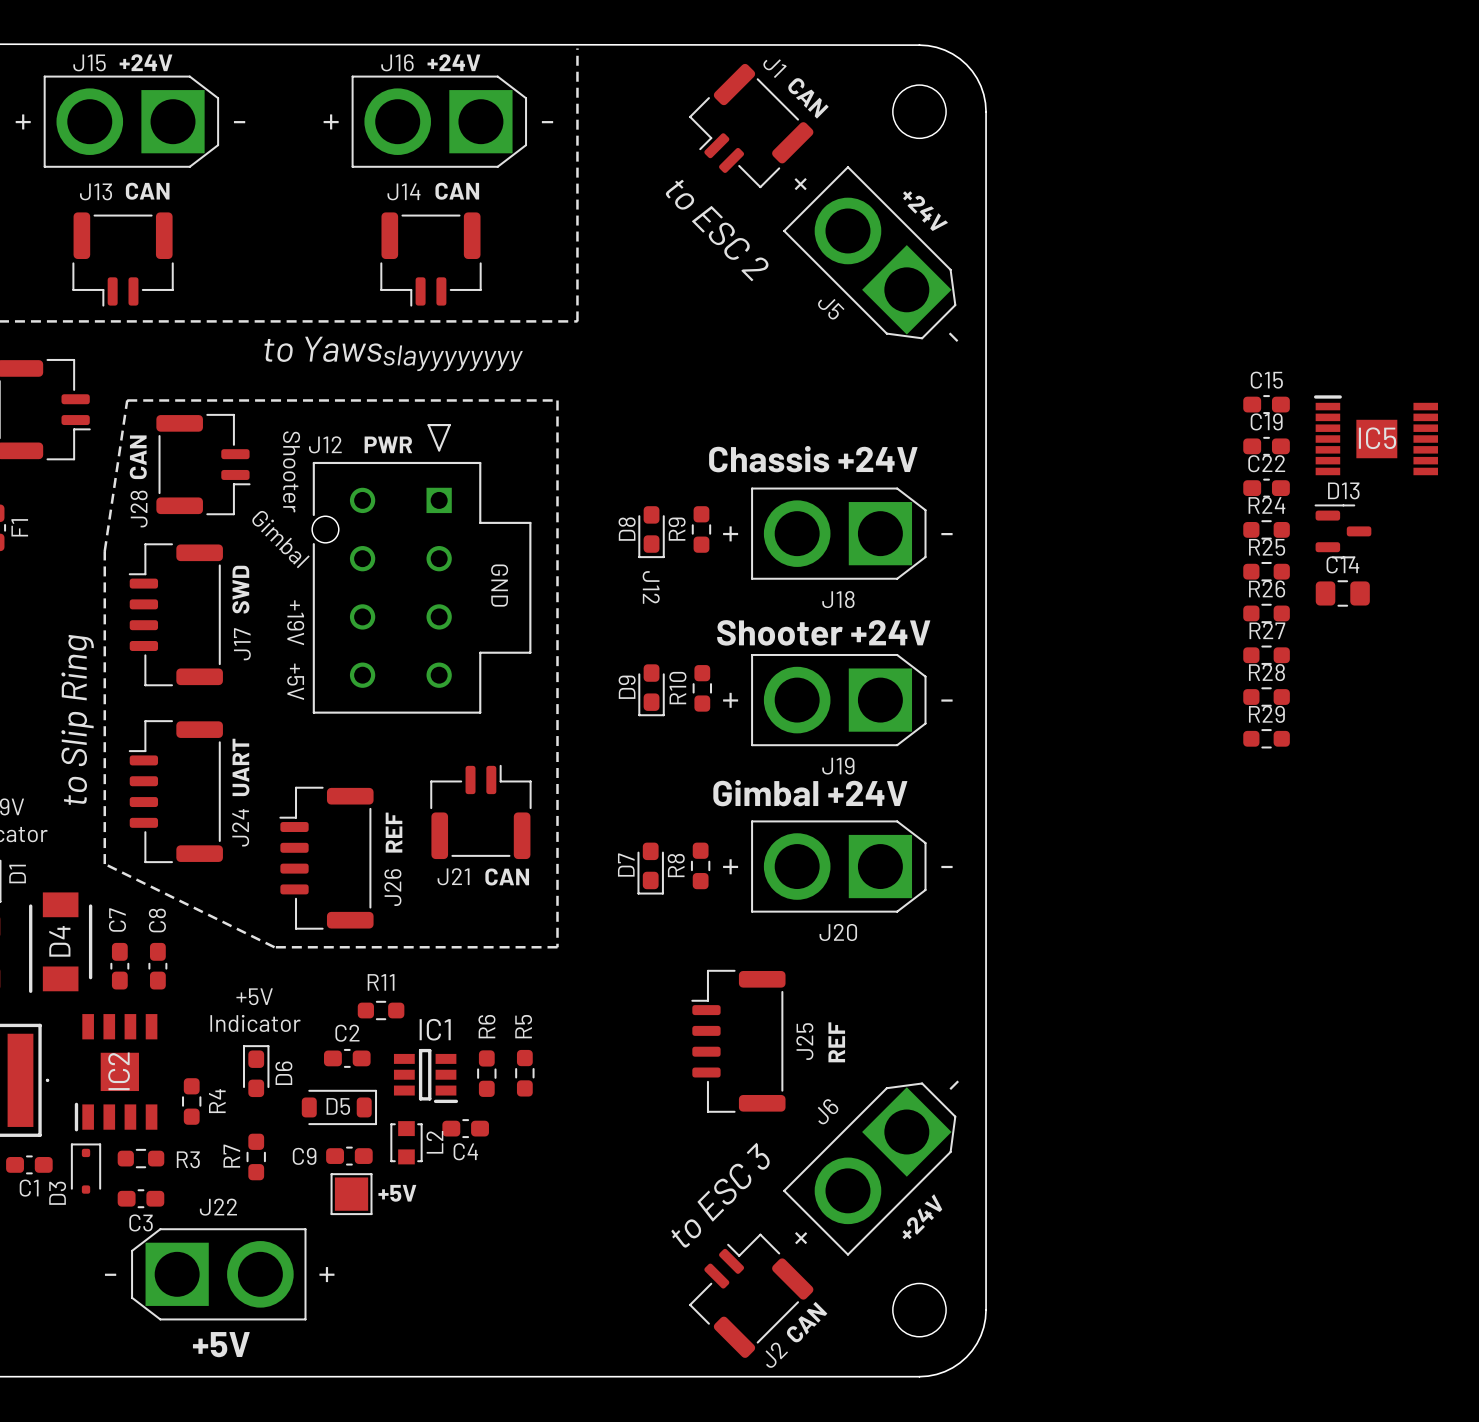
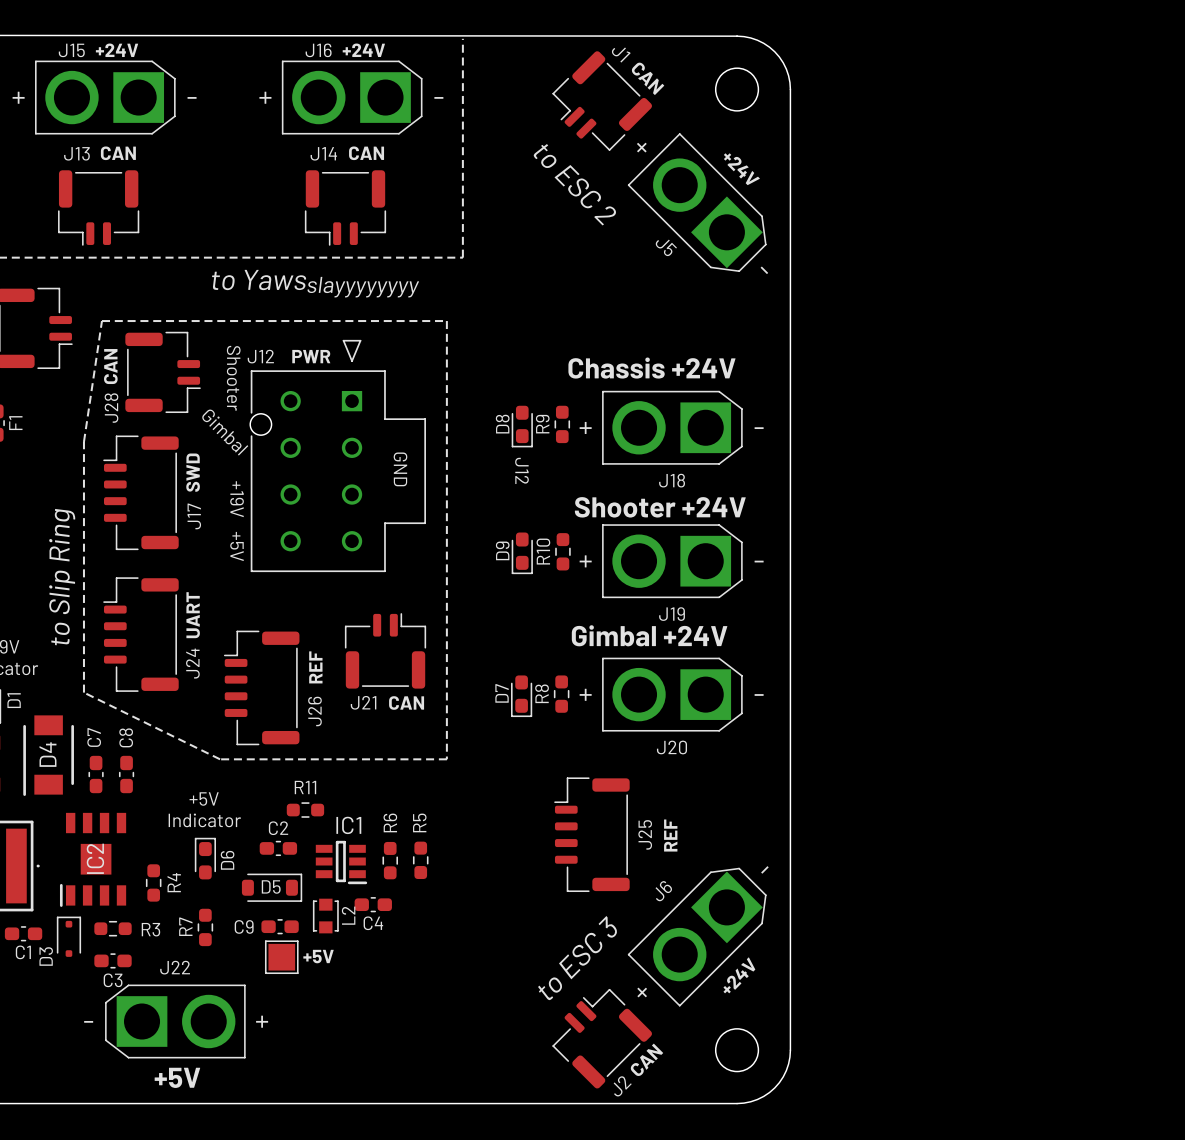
C15: (1266, 404) -> none
IC5: (1376, 435) -> none
C19: (1266, 446) -> none
C22: (1266, 488) -> none
R24: (1266, 529) -> none
D13: (1342, 531) -> none
R25: (1266, 571) -> none
C14: (1342, 593) -> none
R26: (1266, 613) -> none
R27: (1266, 655) -> none
R28: (1266, 697) -> none
R29: (1266, 738) -> none

